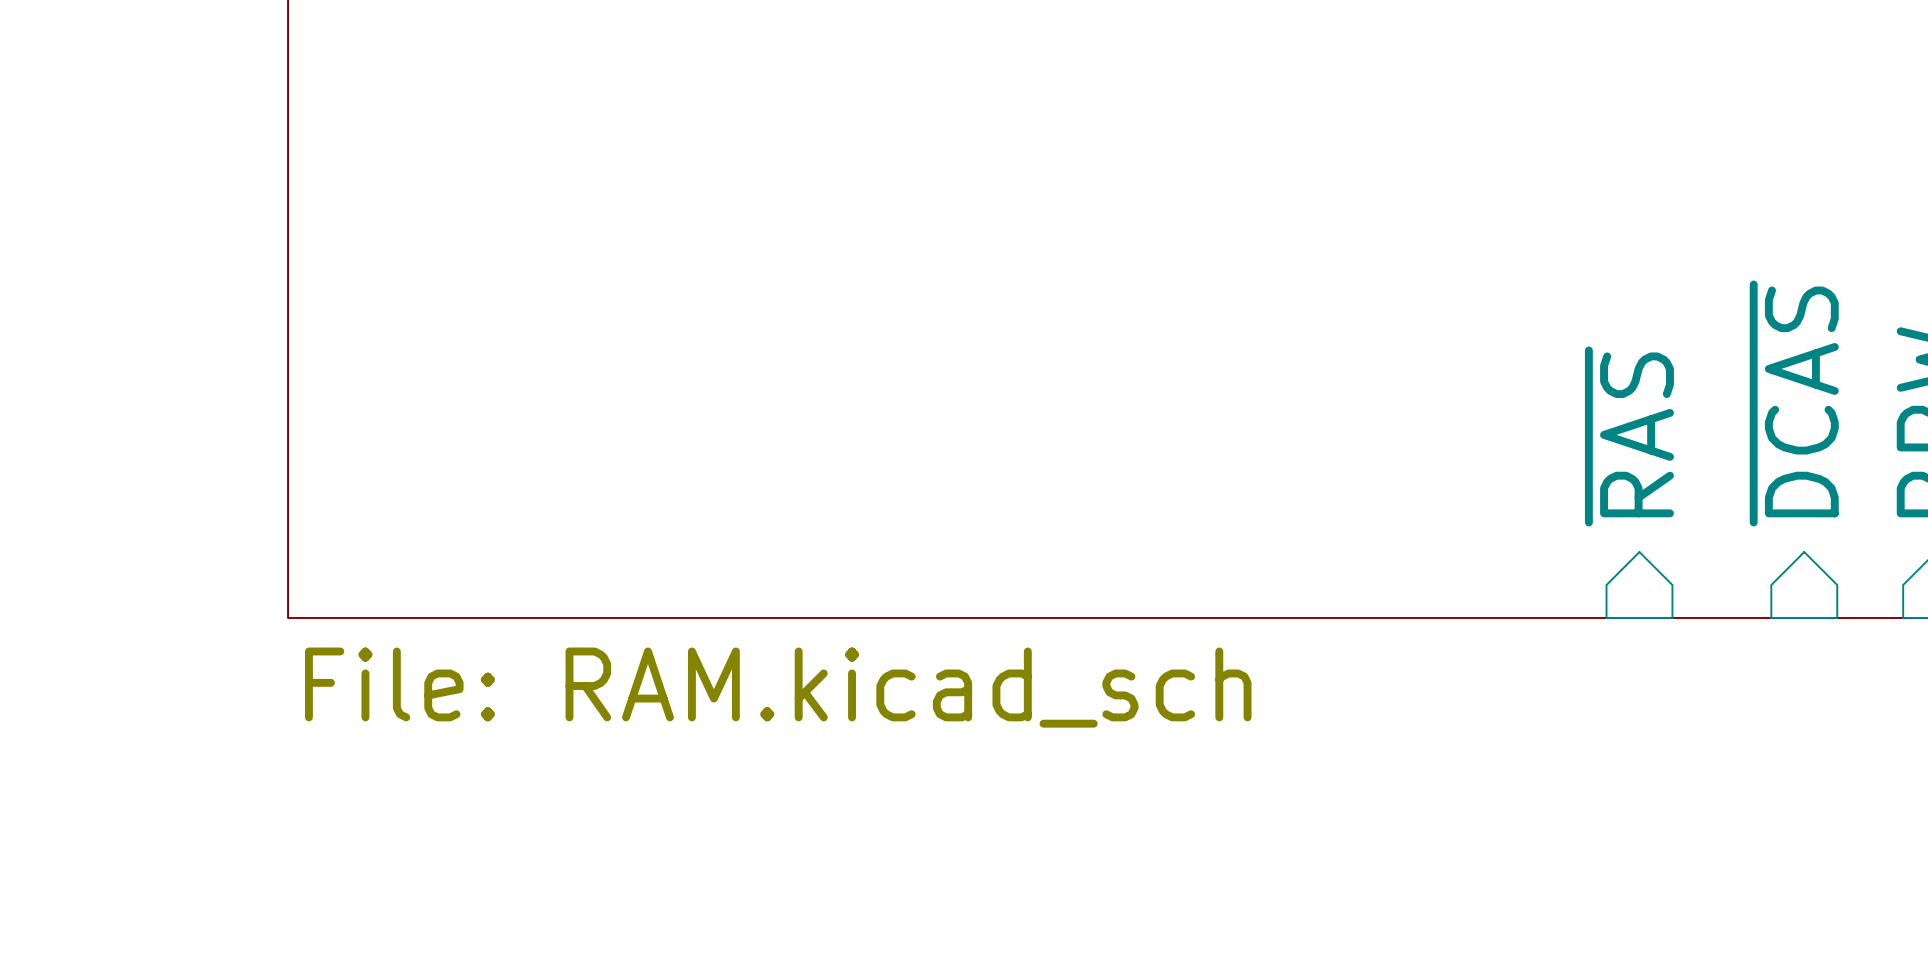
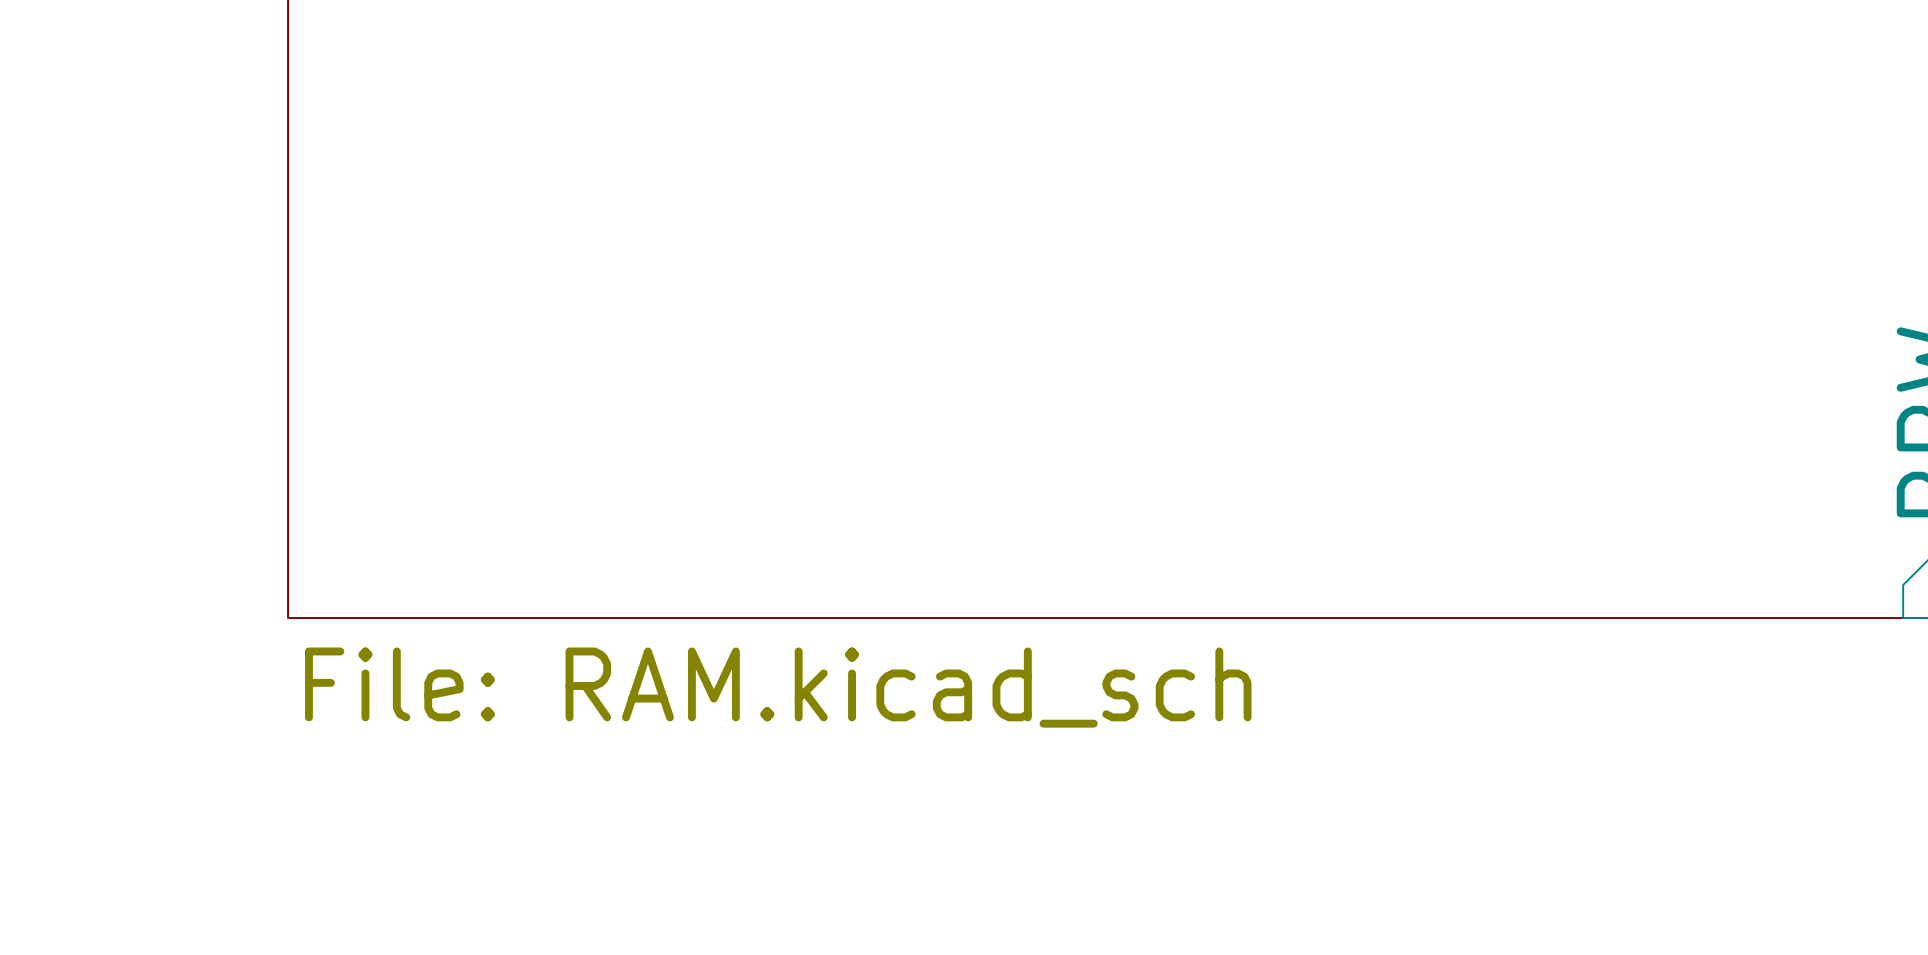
sheet pin: ~{DCAS} (1794, 403) -> none
sheet pin: ~{RAS} (1629, 436) -> none

